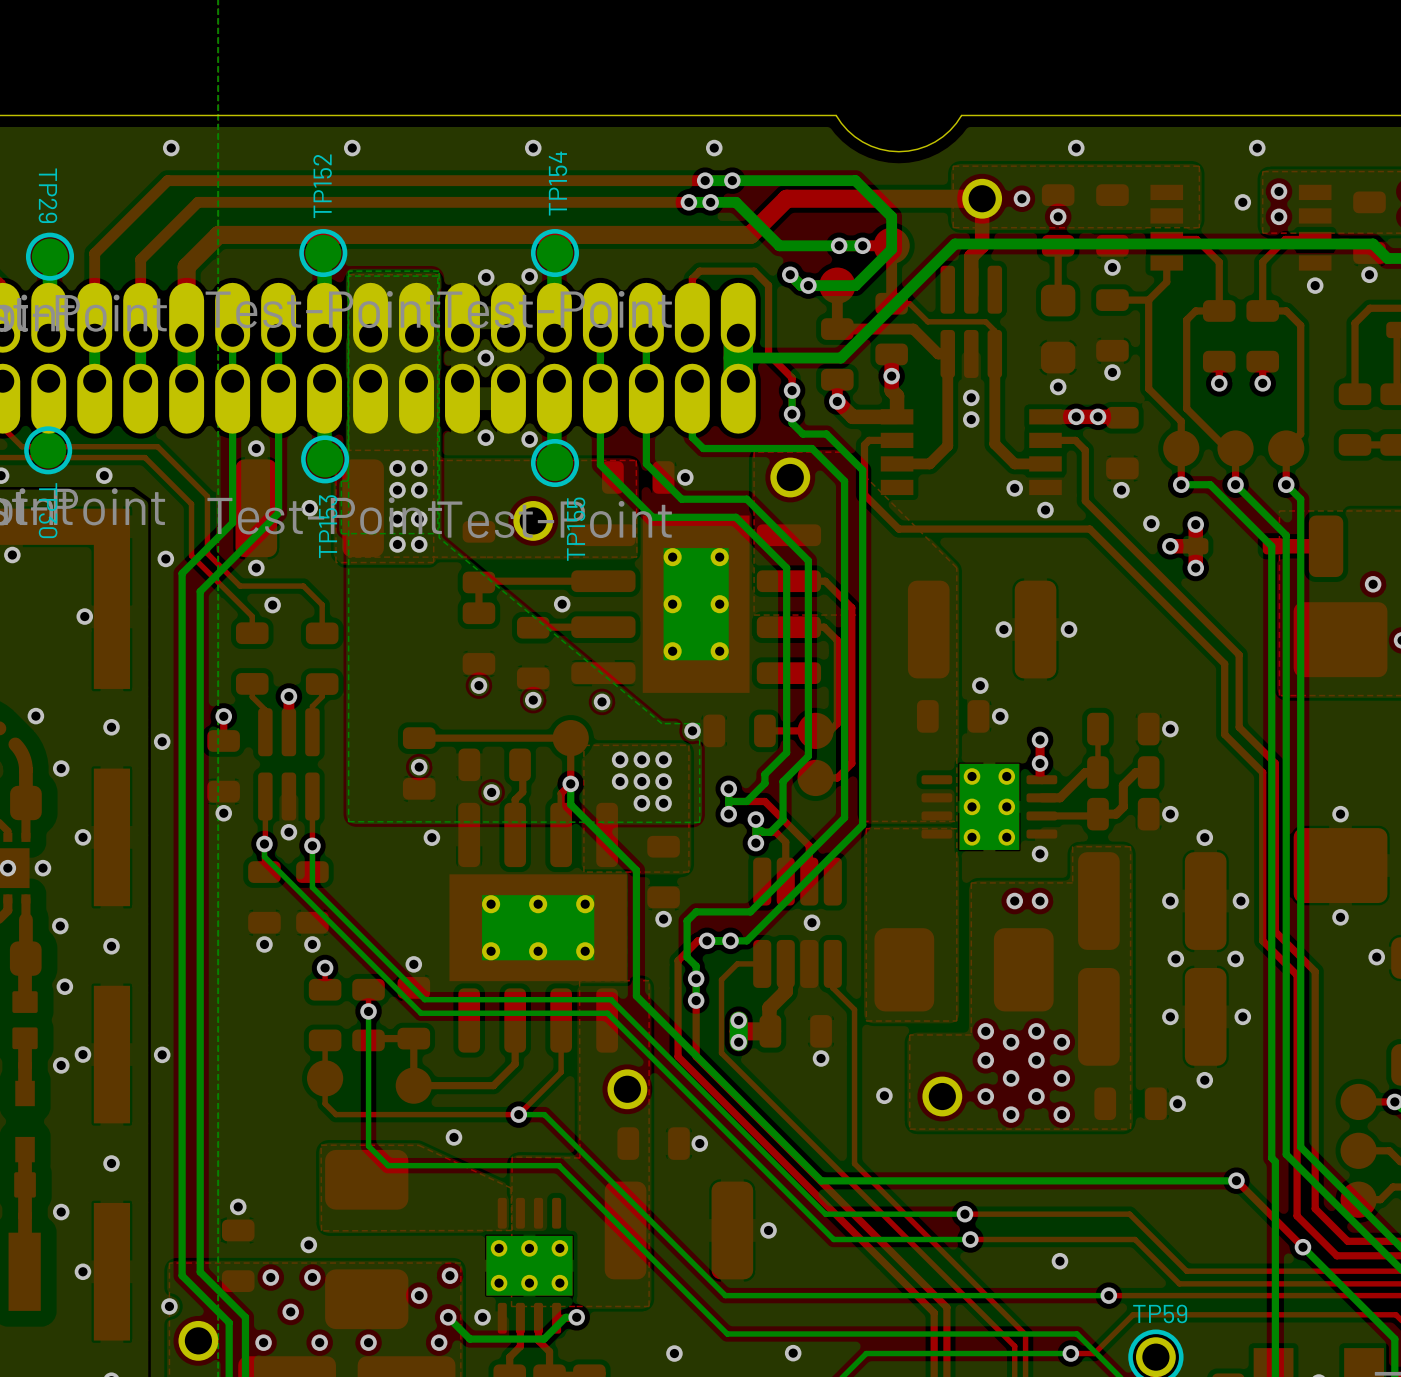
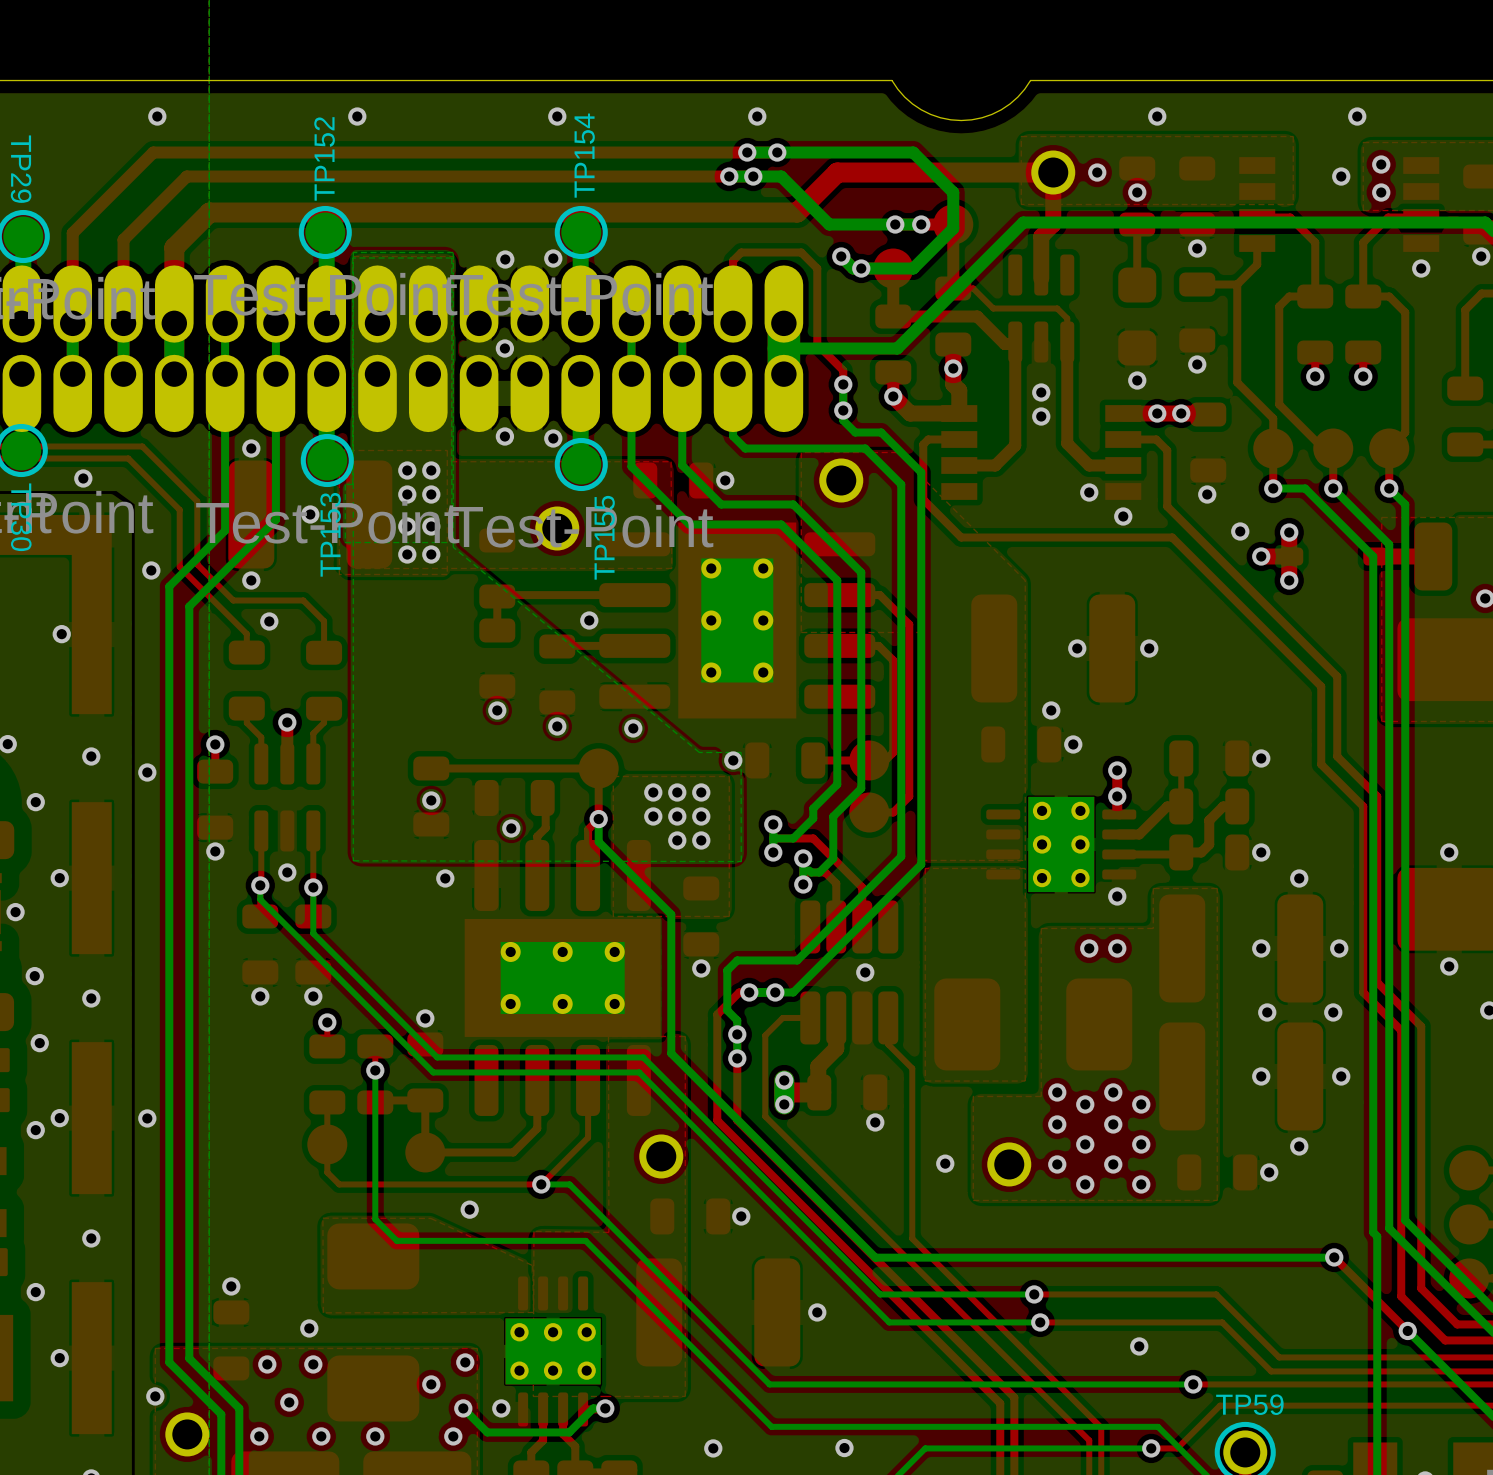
part footprint: [940, 265, 1003, 378] -> [1008, 254, 1075, 363]
part footprint: [258, 708, 320, 821] -> [254, 743, 321, 852]

